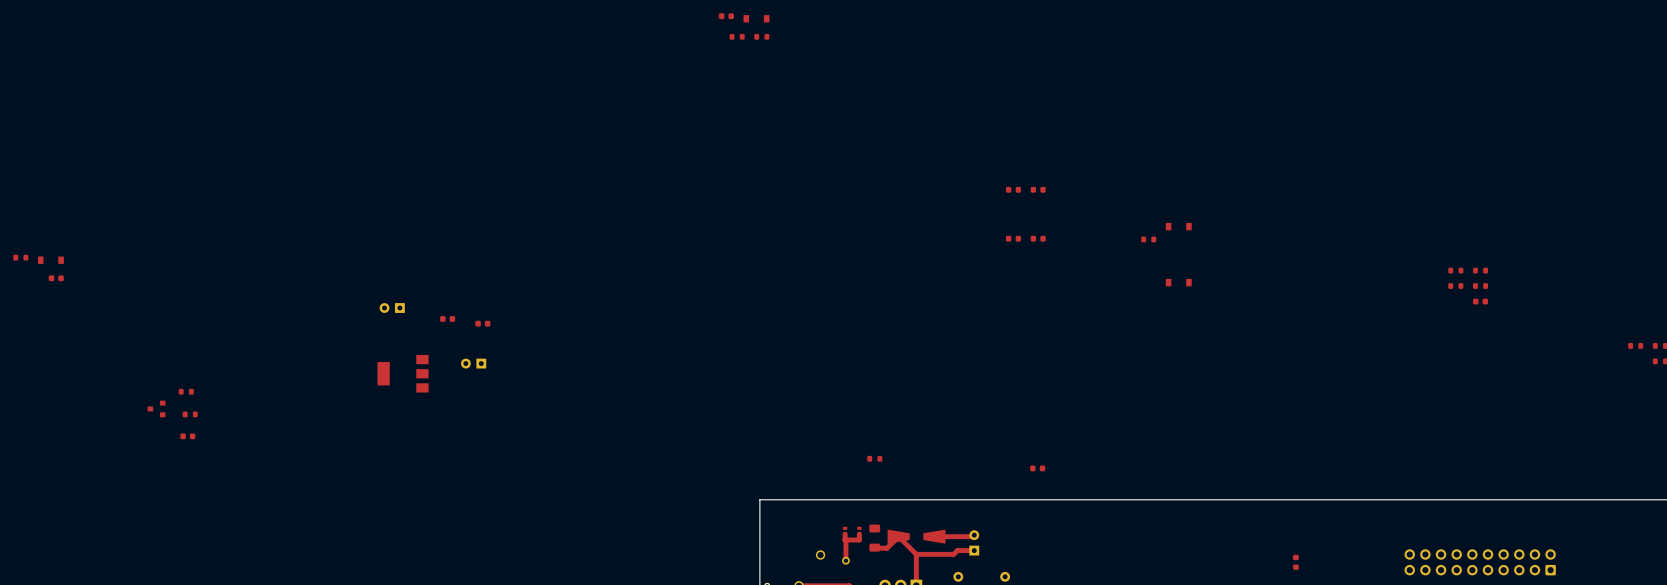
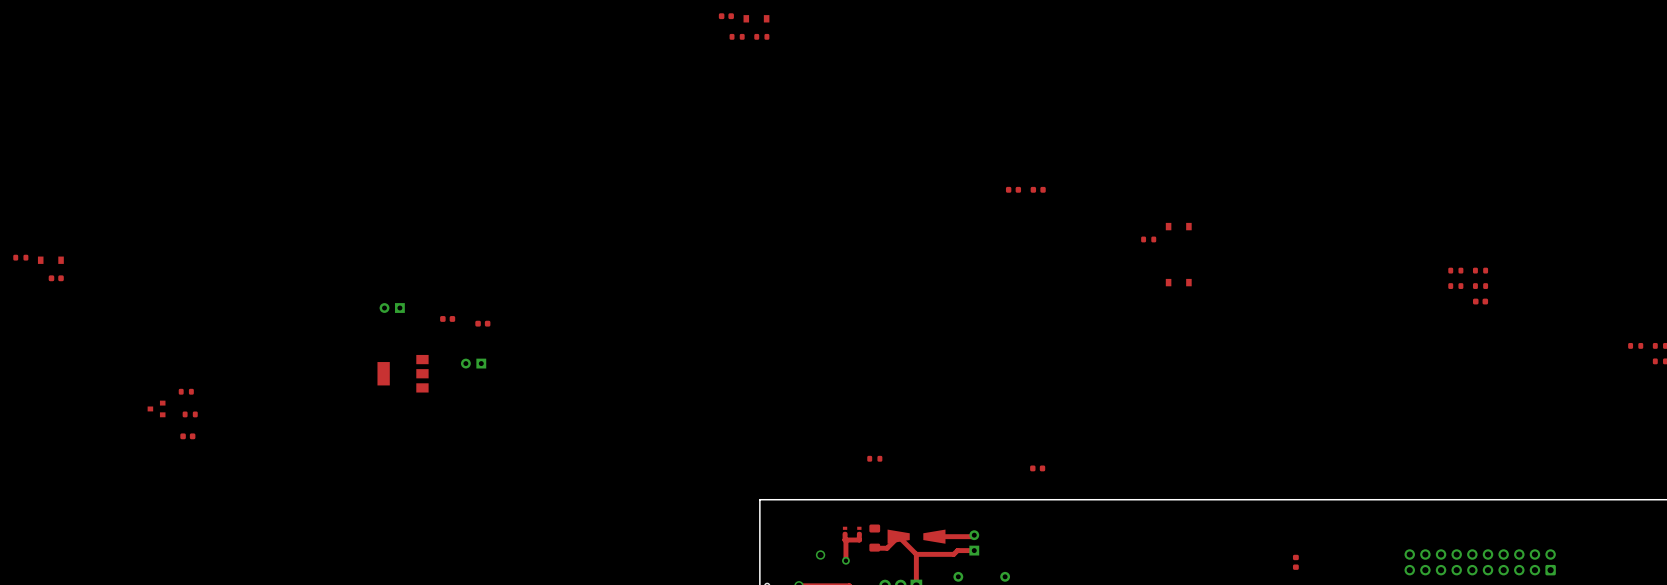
part: (1013, 238) -> none
part: (1038, 238) -> none

